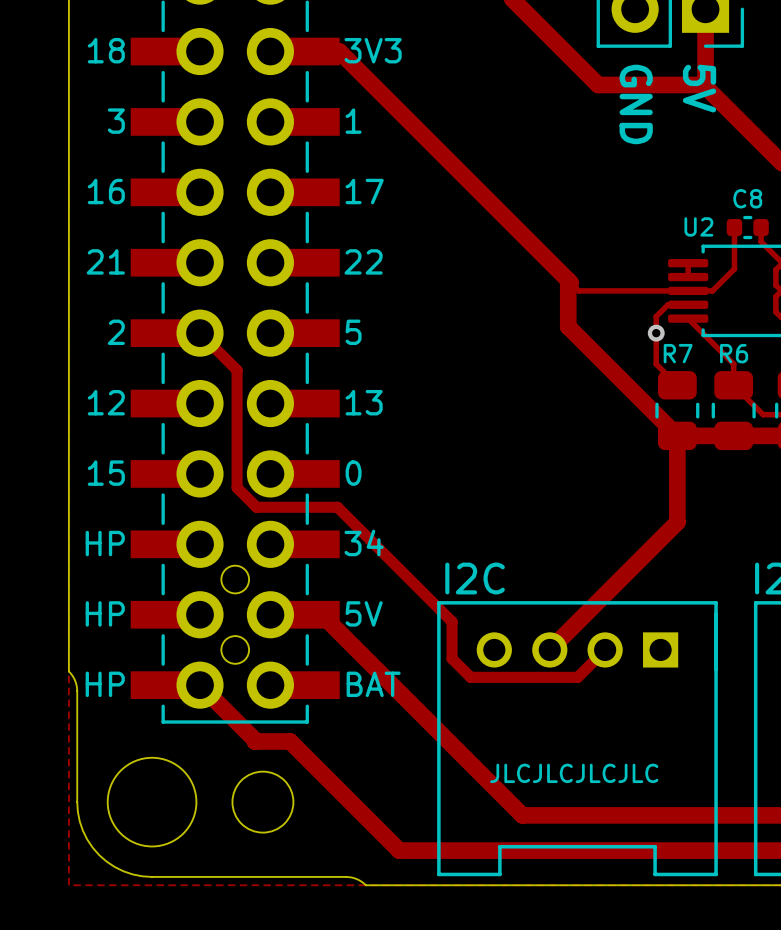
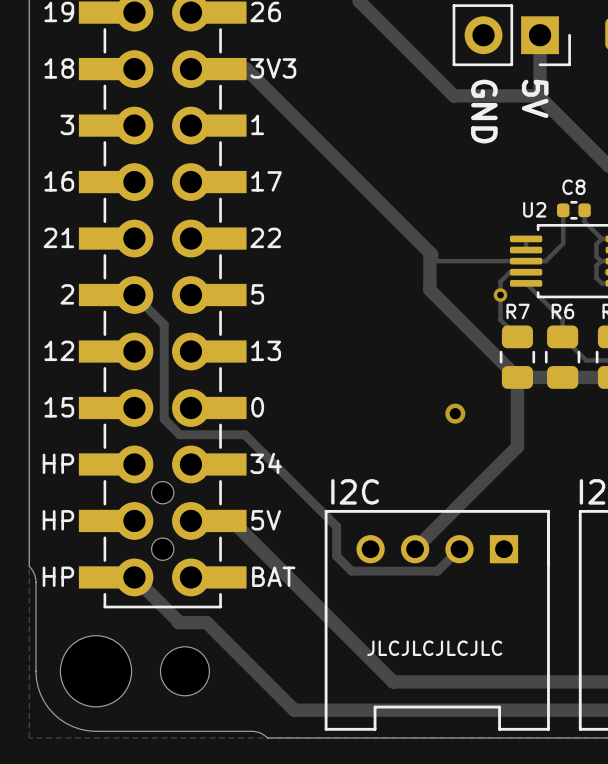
via: none -> (455, 413)

